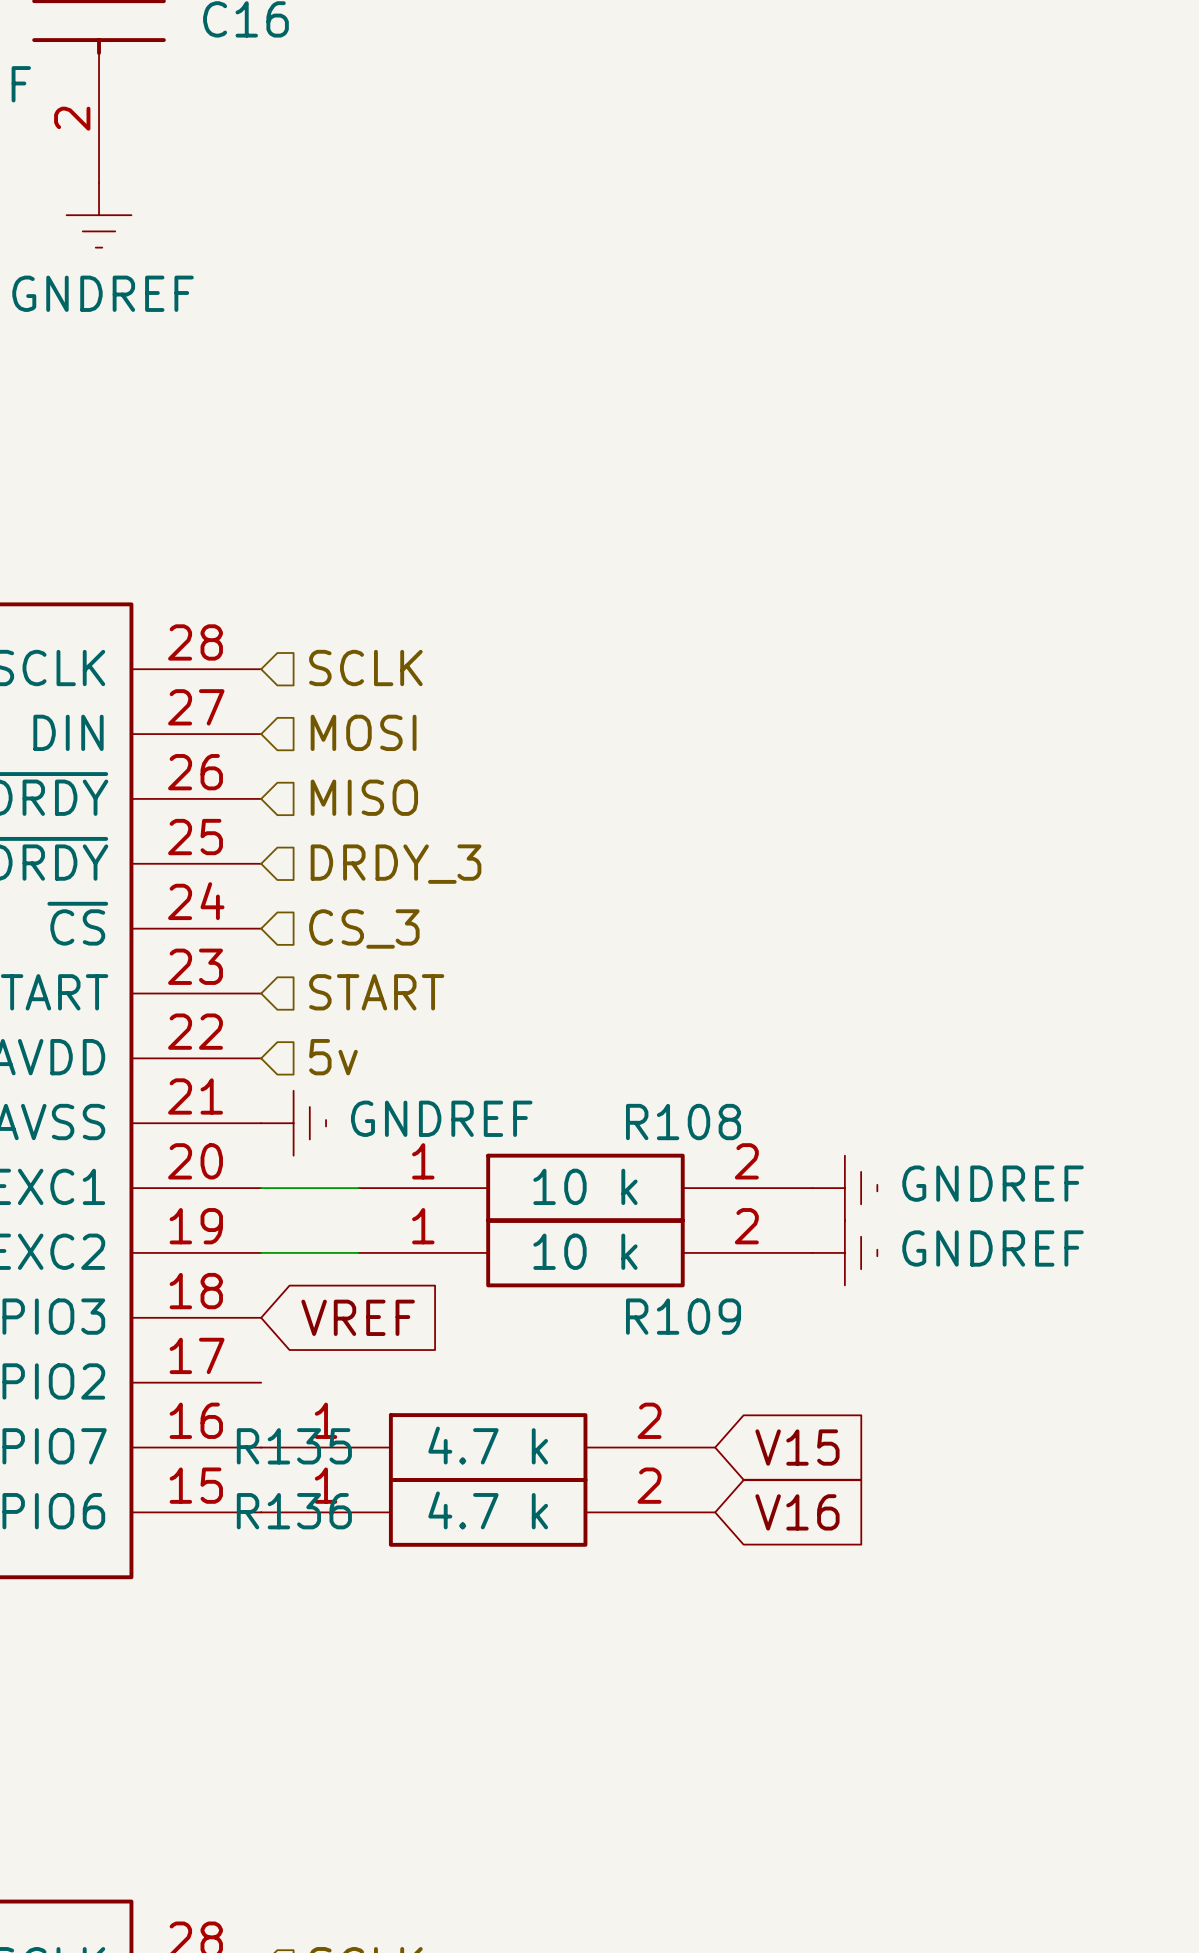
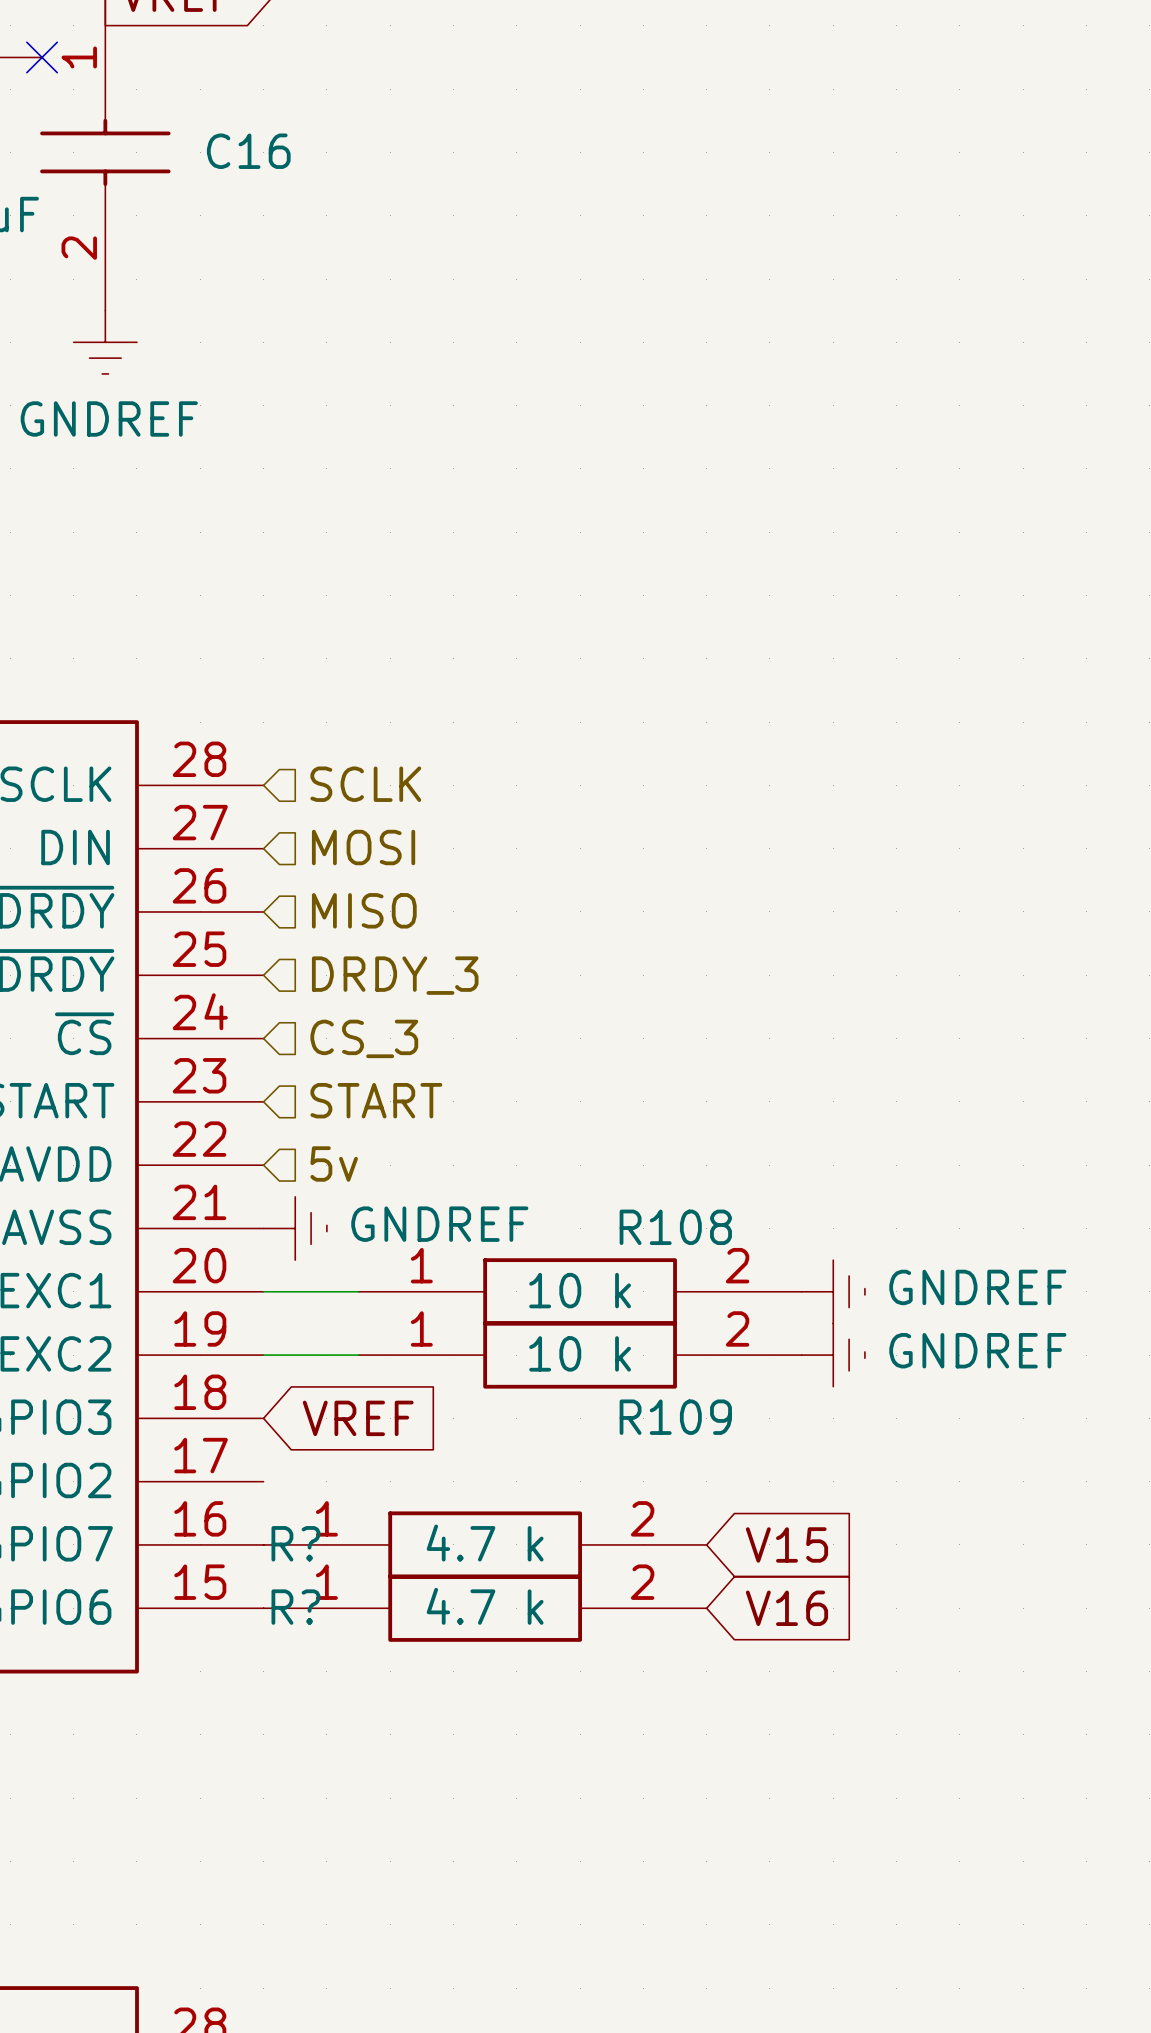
R135 name: R135 (294, 1446) -> R? (295, 1543)
R136 name: R136 (294, 1511) -> R? (295, 1607)

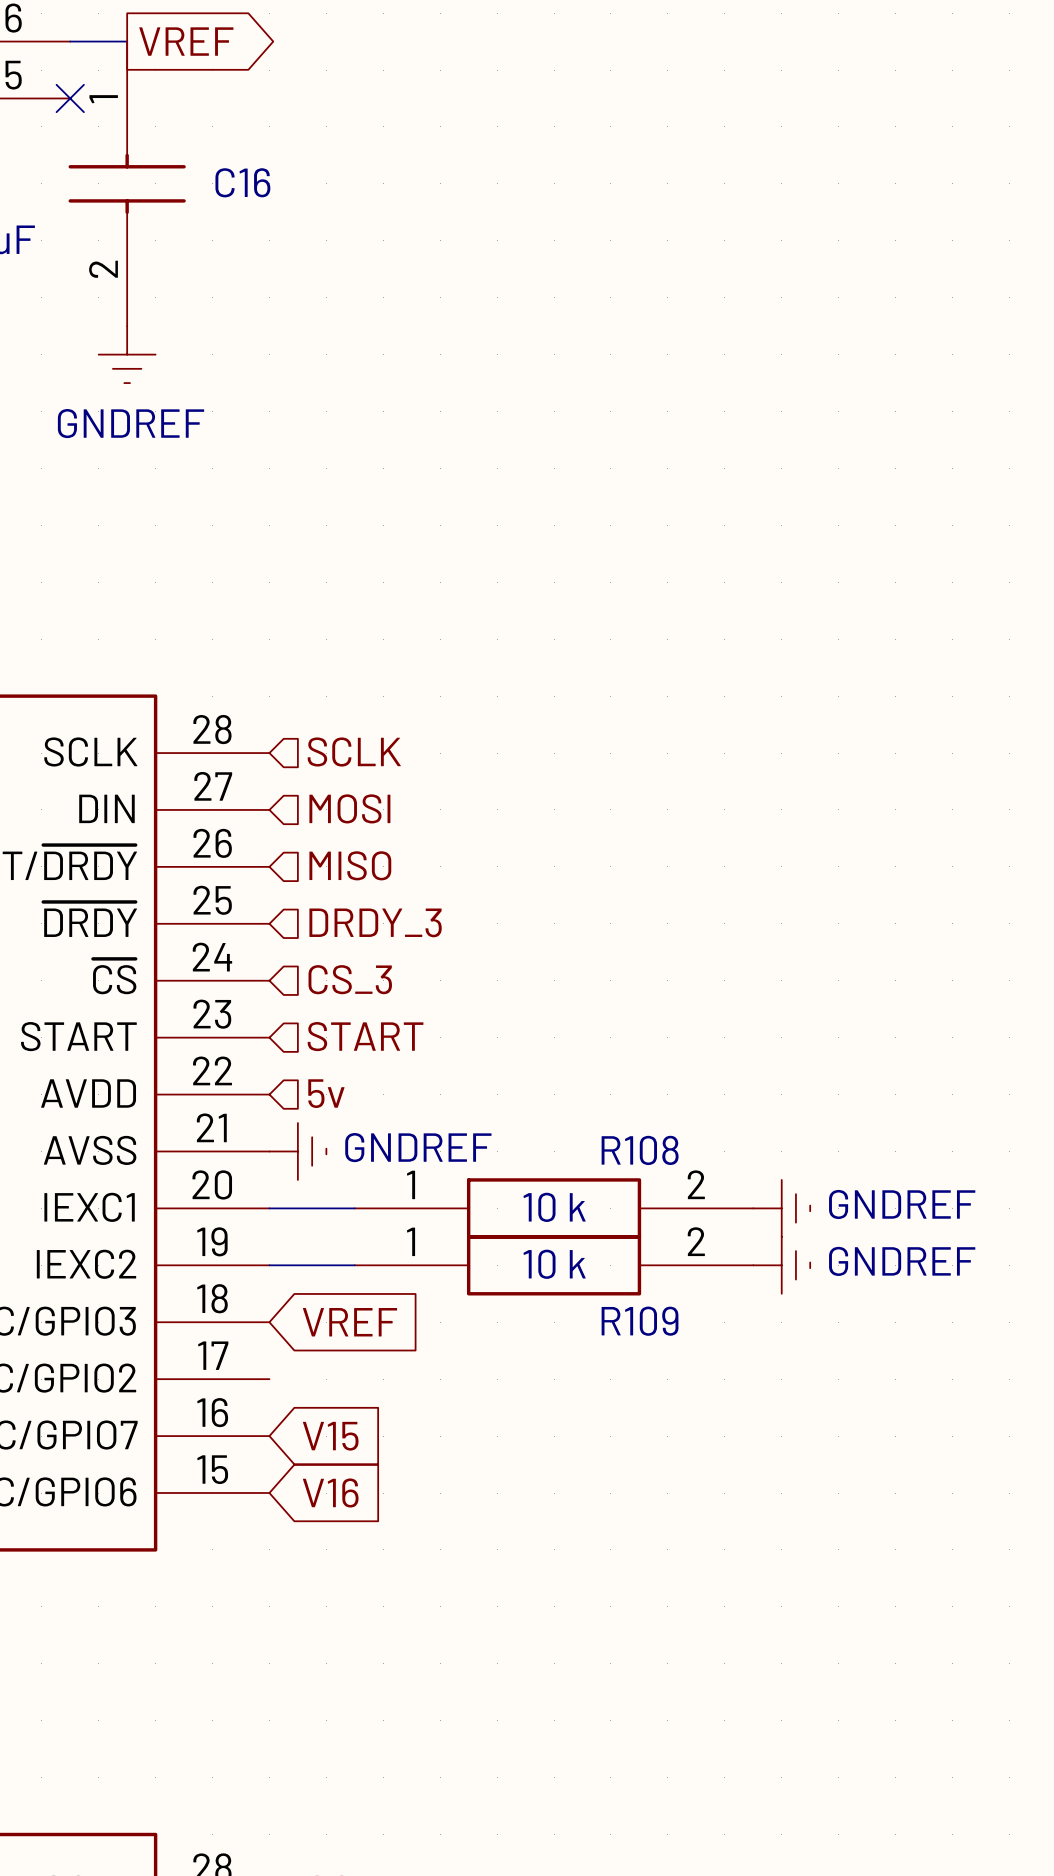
R?: (485, 1544) -> none
global label position: V15 (786, 1544) -> V15 (330, 1436)
R?: (485, 1608) -> none
global label position: V16 (786, 1608) -> V16 (330, 1492)

